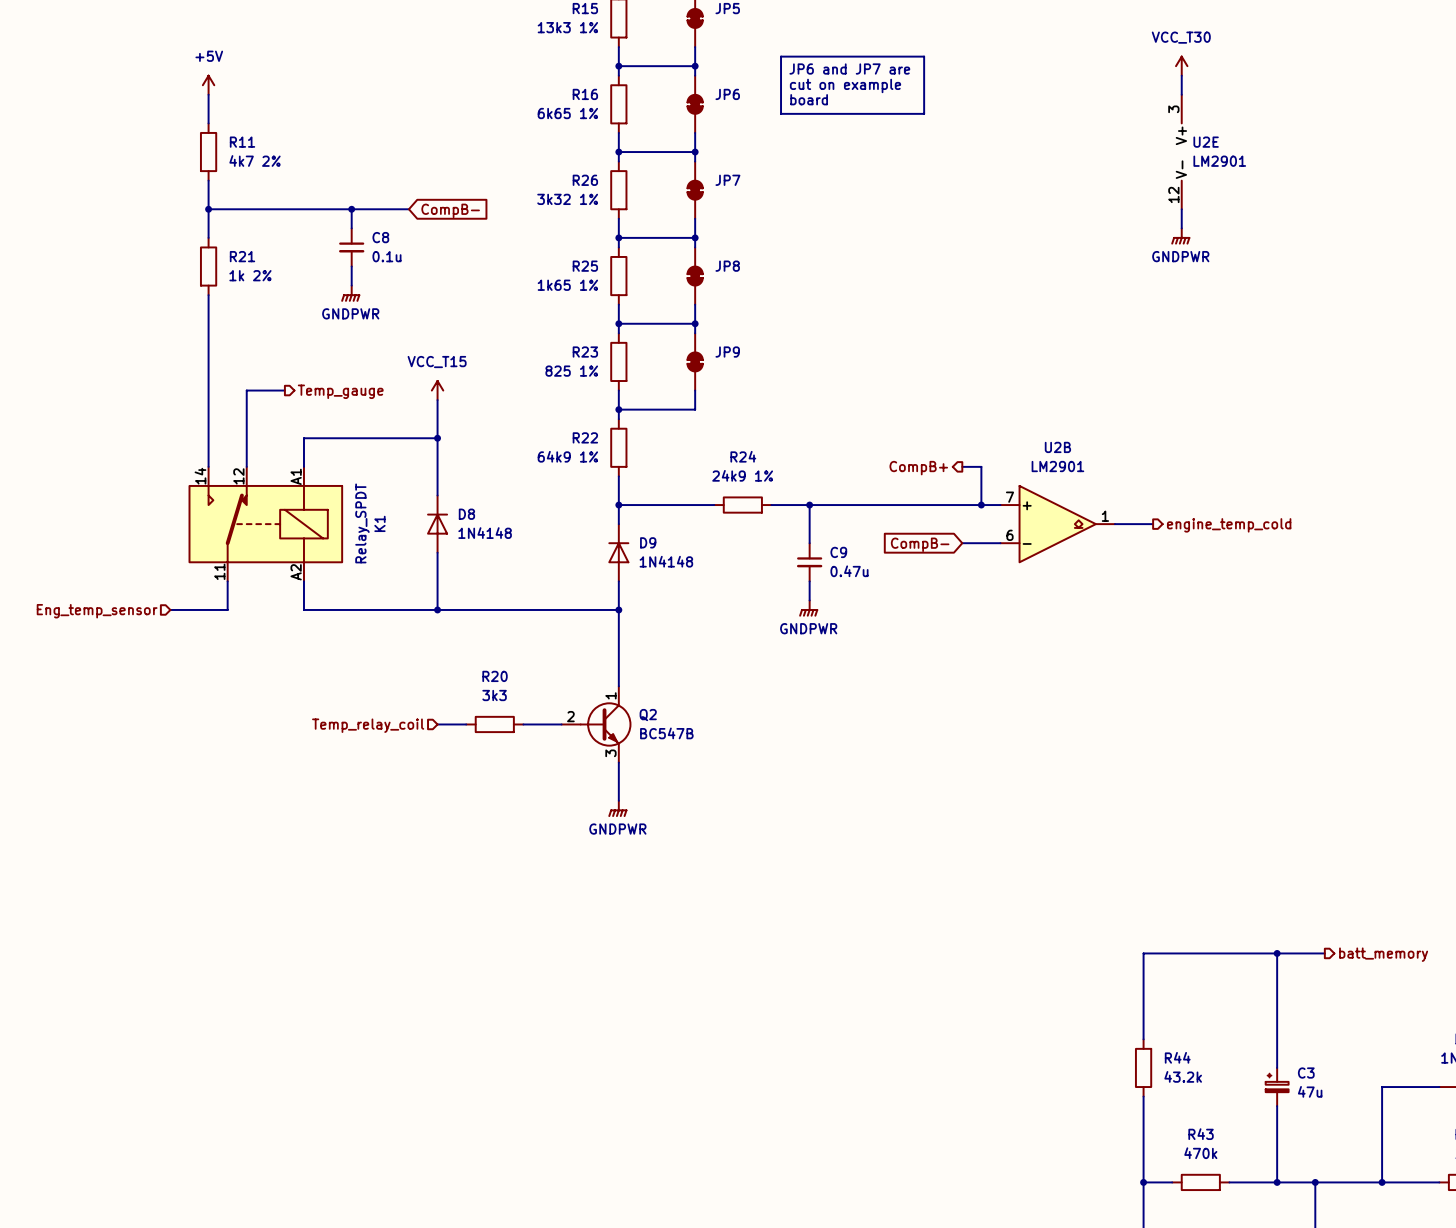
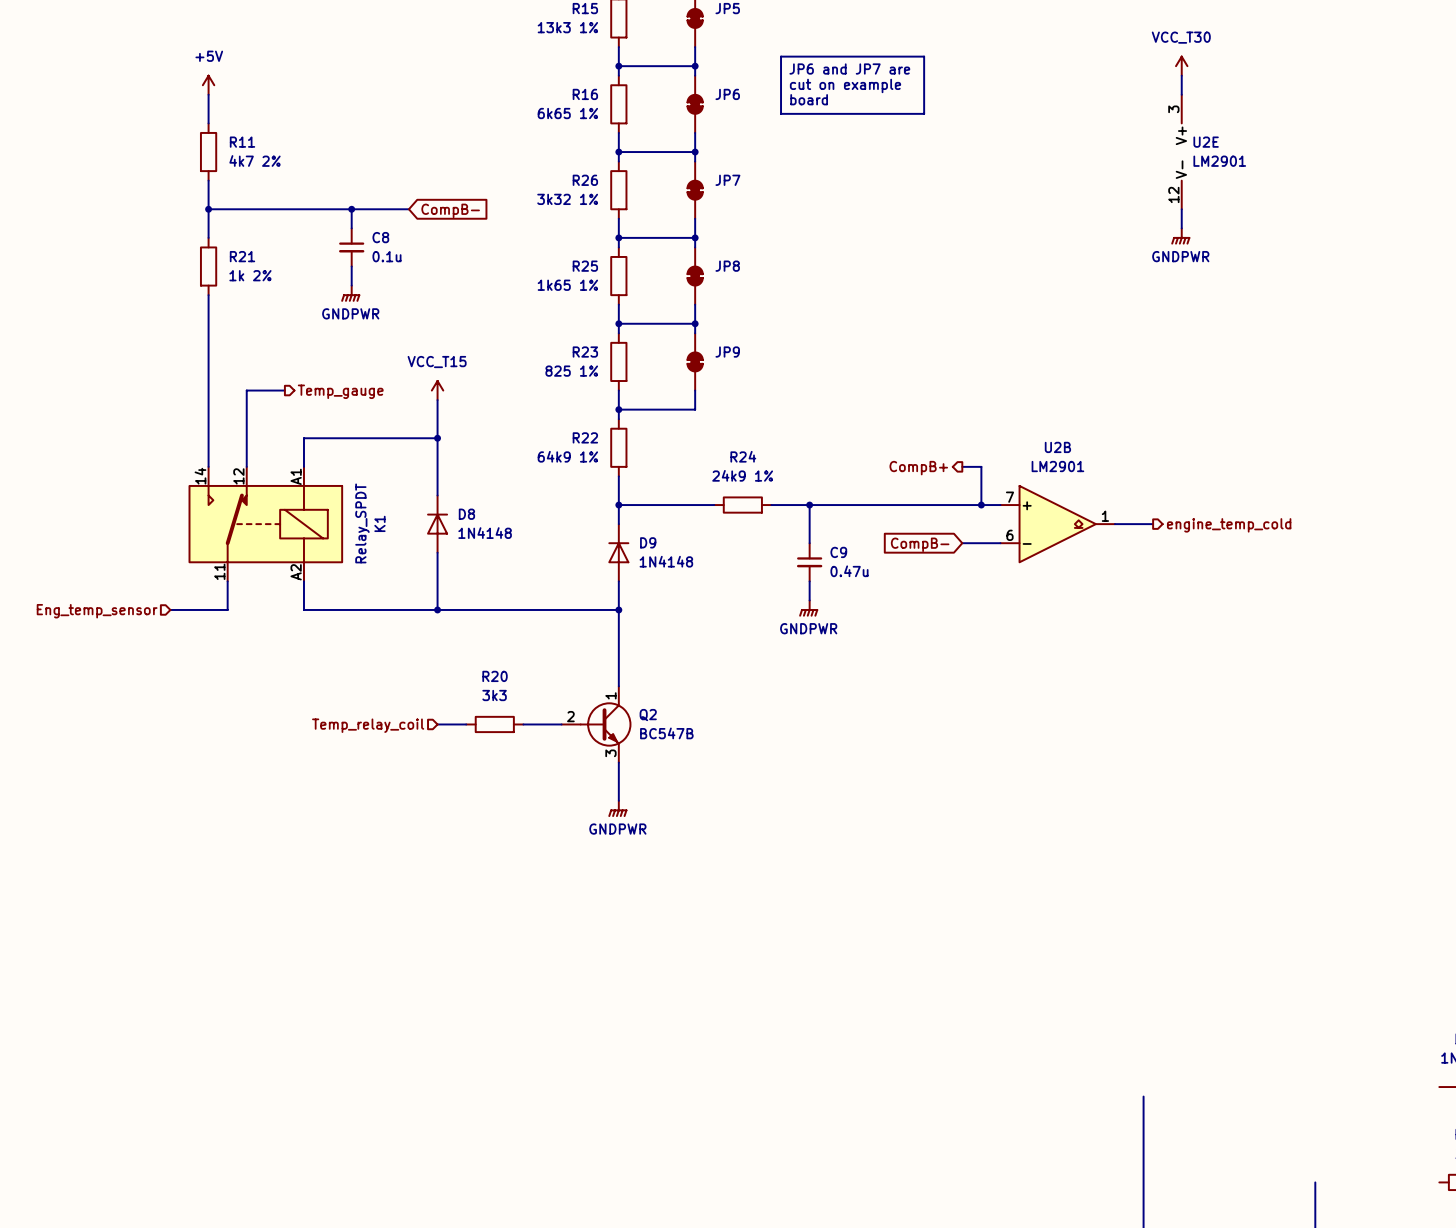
wire: (1277, 953) (1277, 1067) -> none
junction: (1277, 953) -> none
wire: (1324, 953) (1143, 953) (1143, 1039) -> none
hierarchical label: batt_memory (1383, 954) -> none
R44: 43.2k (1143, 1067) -> none
C3: 47u (1277, 1087) -> none
wire: (1439, 1087) (1382, 1087) (1382, 1182) -> none
wire: (1277, 1106) (1277, 1182) -> none
wire: (1143, 1182) (1172, 1182) -> none
junction: (1143, 1182) -> none
R43: 470k (1200, 1182) -> none
wire: (1229, 1182) (1439, 1182) -> none
junction: (1277, 1182) -> none
junction: (1315, 1182) -> none
junction: (1382, 1182) -> none

